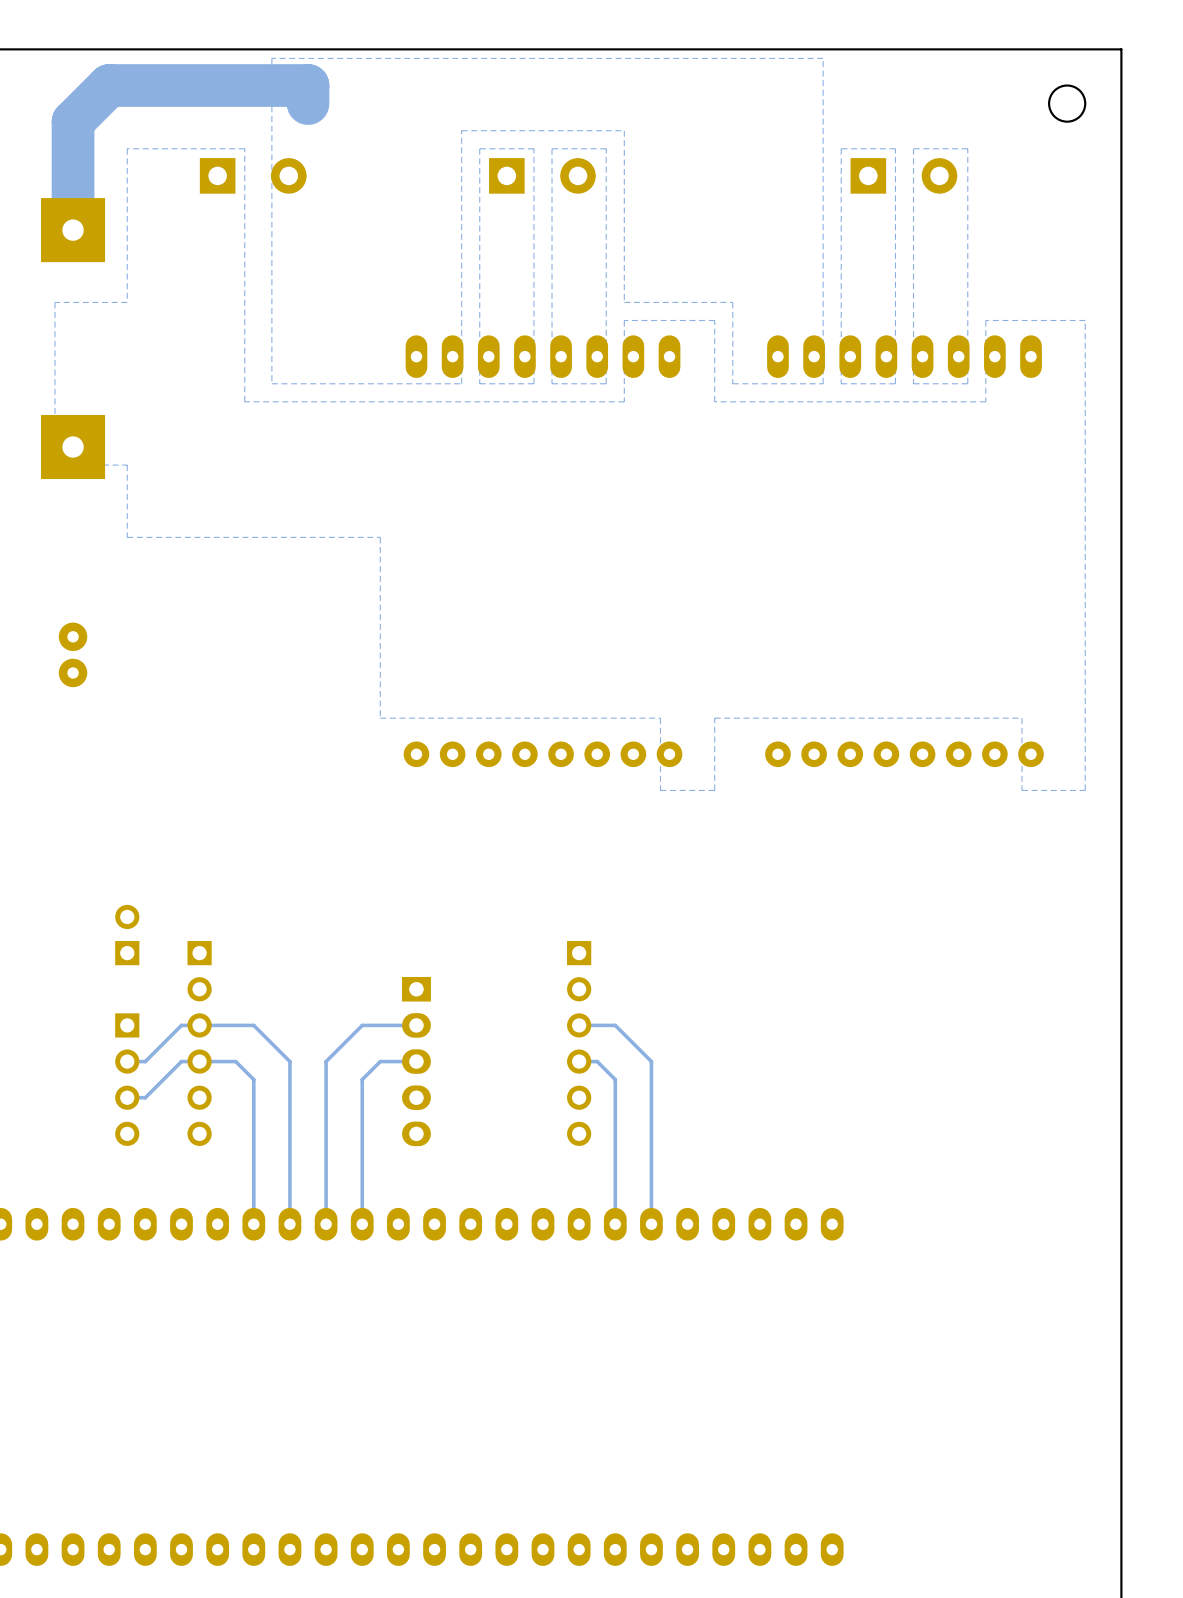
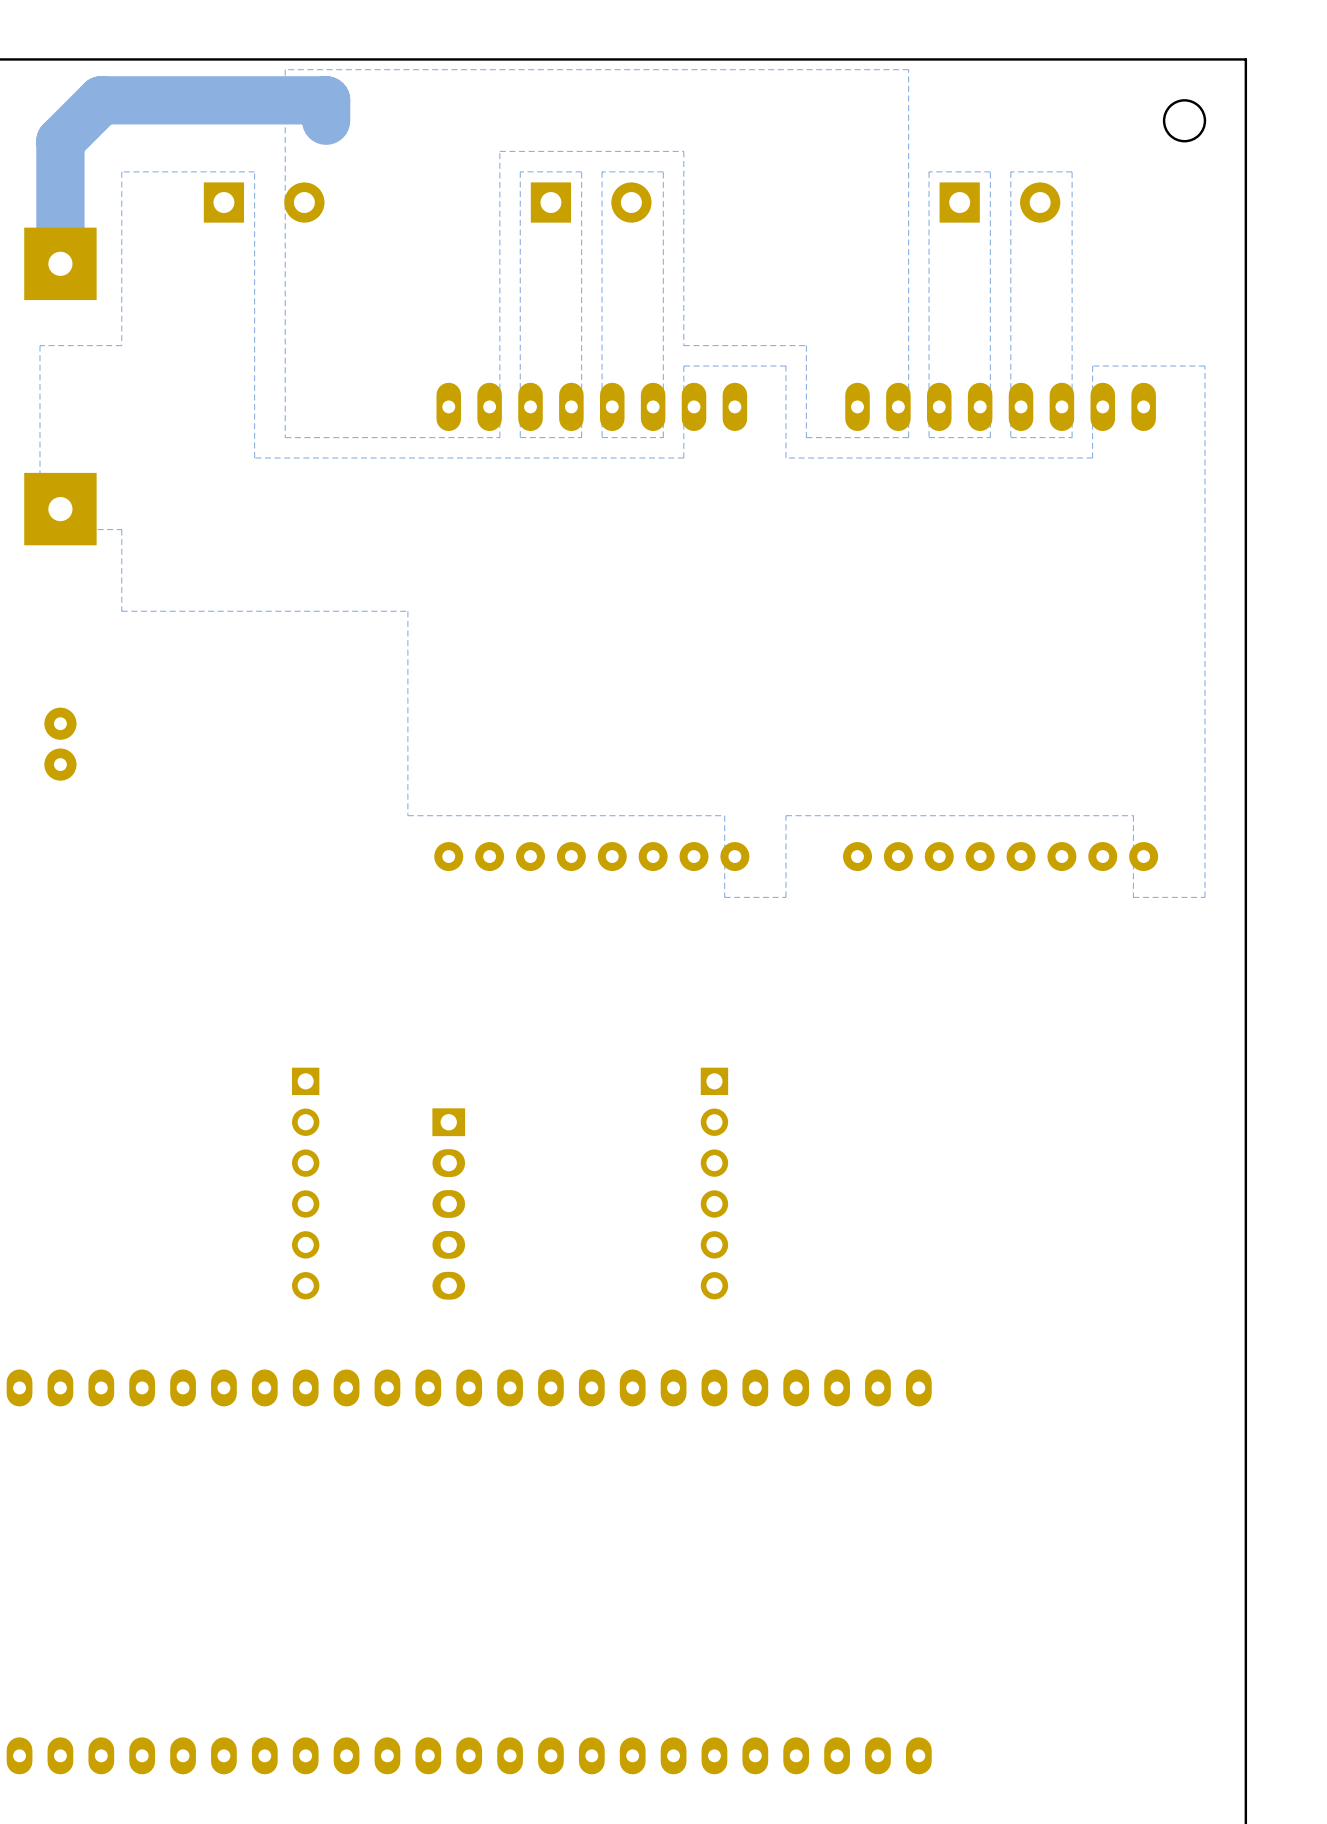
part: (127, 935) -> none
track: (416, 1025) (362, 1025) (326, 1061) (326, 1224) -> none
track: (579, 1025) (615, 1025) (651, 1061) (651, 1224) -> none
part position: (199, 1043) -> (305, 1183)
part position: (579, 1043) -> (714, 1183)
track: (127, 1061) (145, 1061) (181, 1025) (253, 1025) (289, 1061) (289, 1224) -> none
track: (416, 1061) (380, 1061) (362, 1079) (362, 1224) -> none
track: (579, 1061) (597, 1061) (615, 1079) (615, 1224) -> none
part: (127, 1079) -> none
track: (127, 1097) (145, 1097) (181, 1061) (235, 1061) (253, 1079) (253, 1224) -> none

